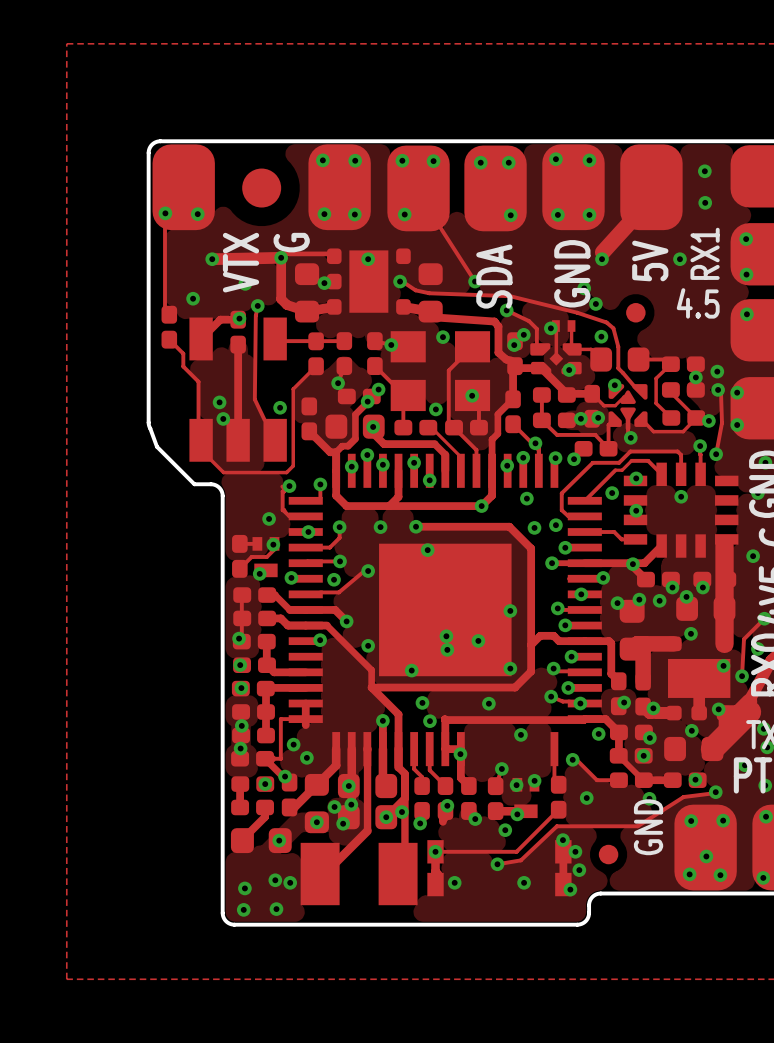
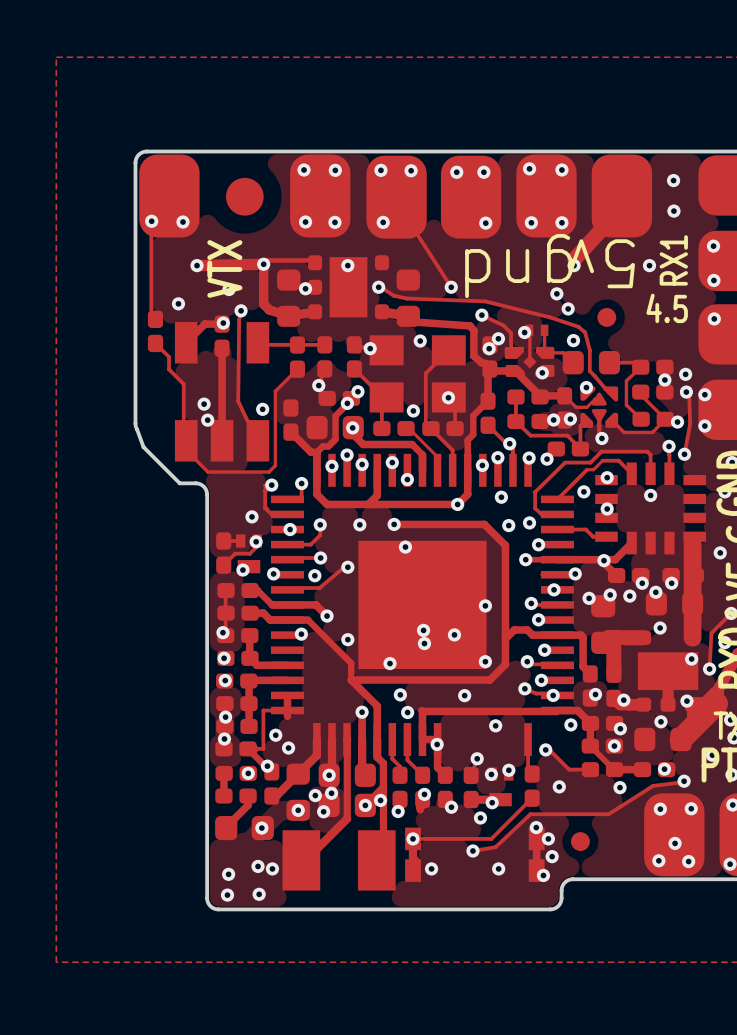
text: G (291, 242) -> none
text: none -> 5v (601, 263)
text: none -> gnd (518, 266)
text: 5V (650, 260) -> none
text: GND (572, 273) -> none
text: SDA (494, 276) -> none
text: GND (648, 827) -> none

